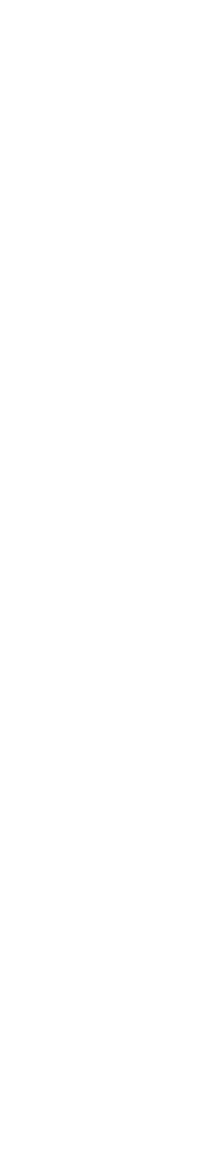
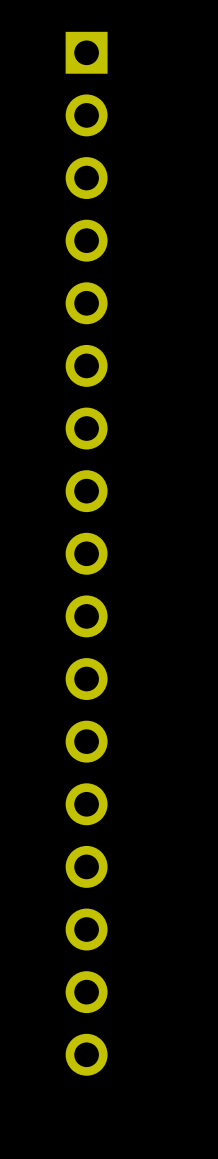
part: none -> (86, 553)

